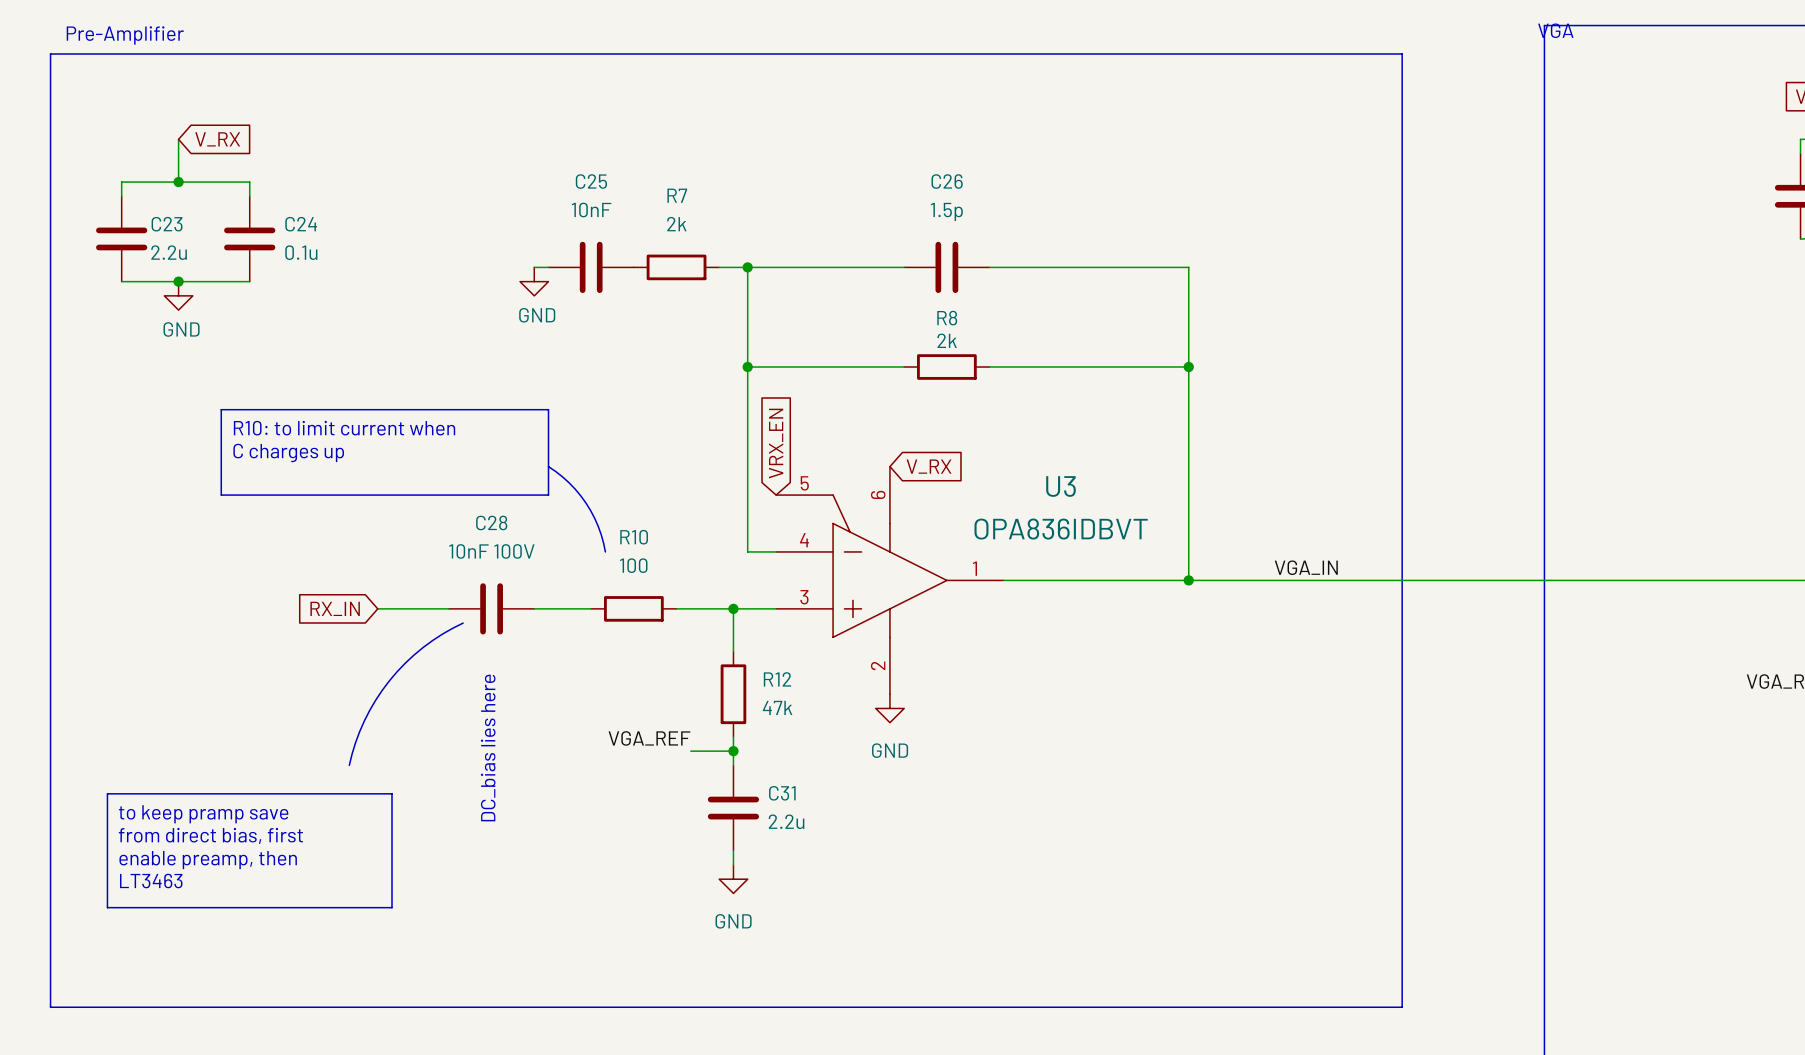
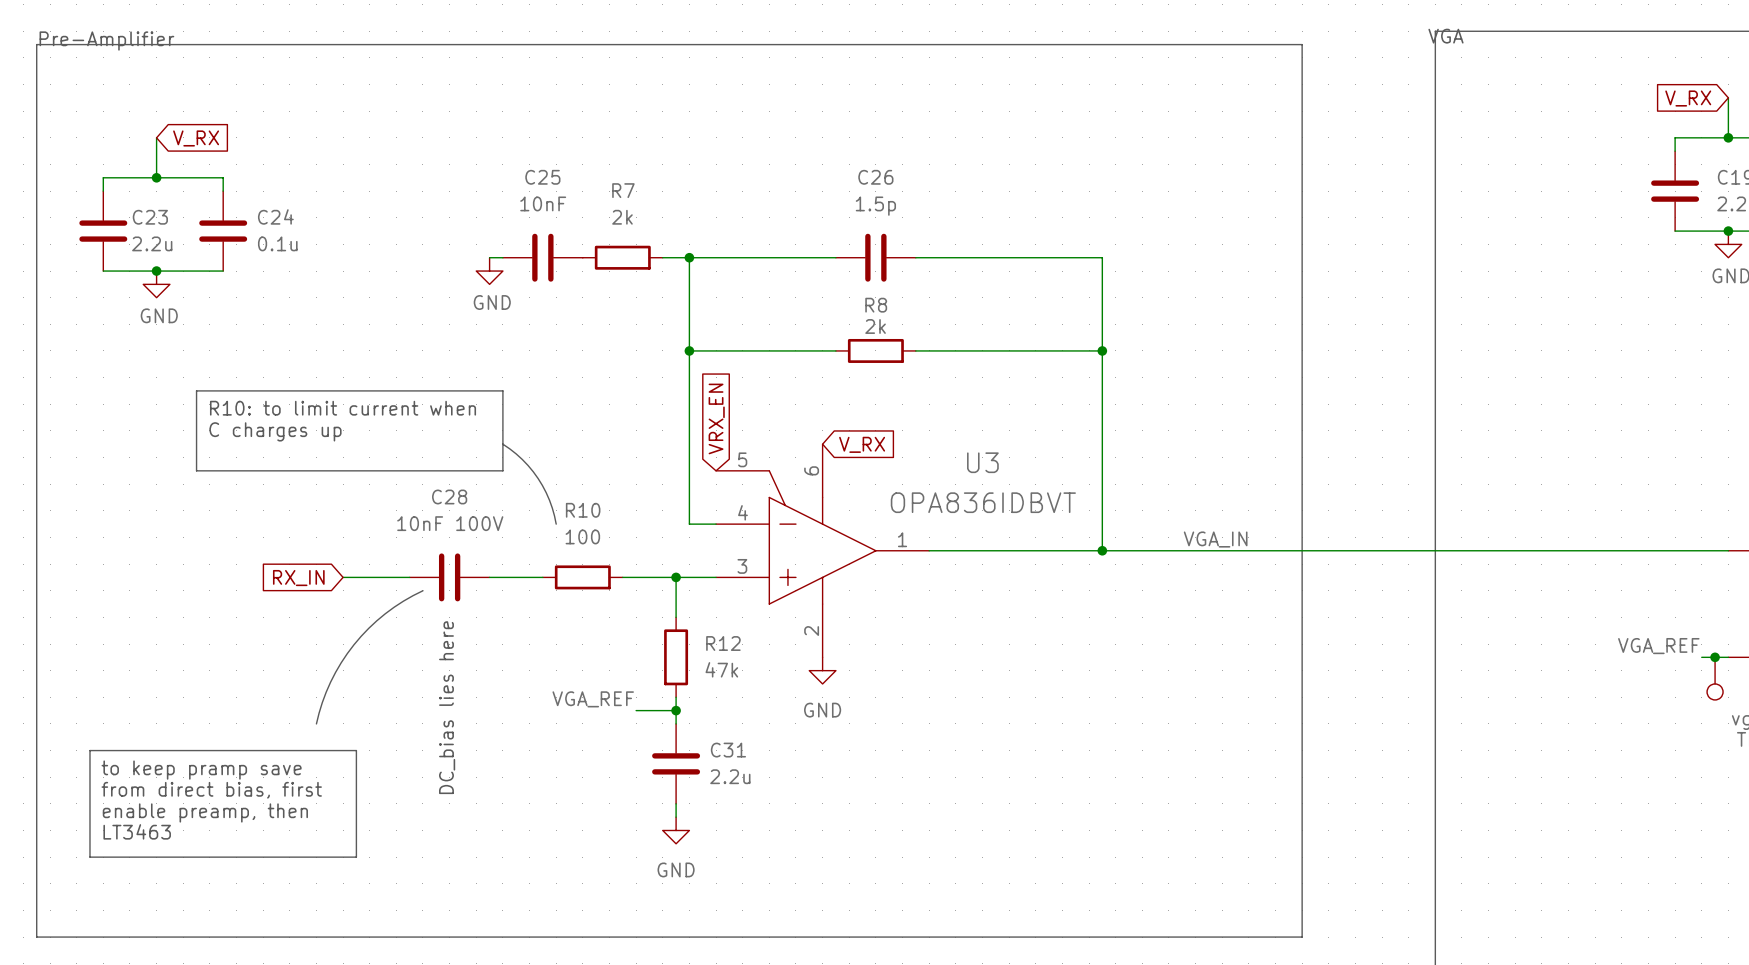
line: (50, 54) (1402, 54) -> (36, 57) (36, 44) (1302, 44) (1302, 57)
line: (50, 993) (50, 1007) (1402, 1007) (1402, 993) -> (36, 937) (1302, 937)

